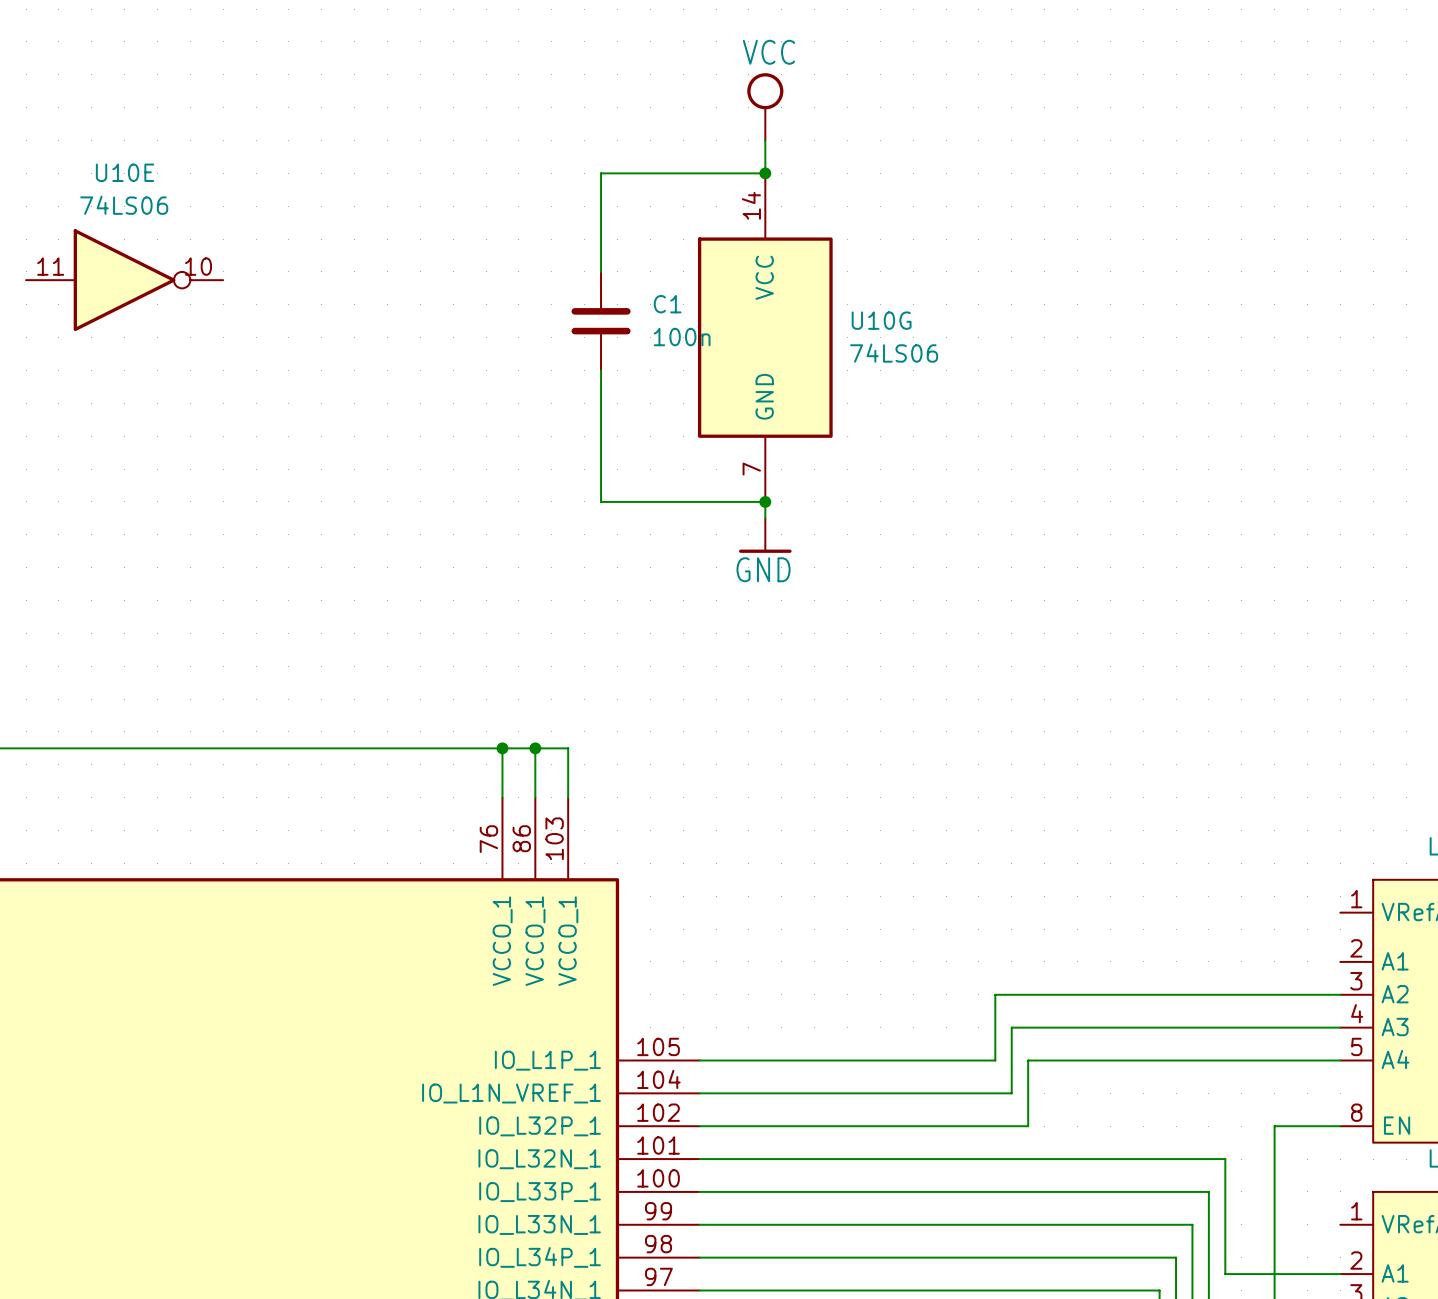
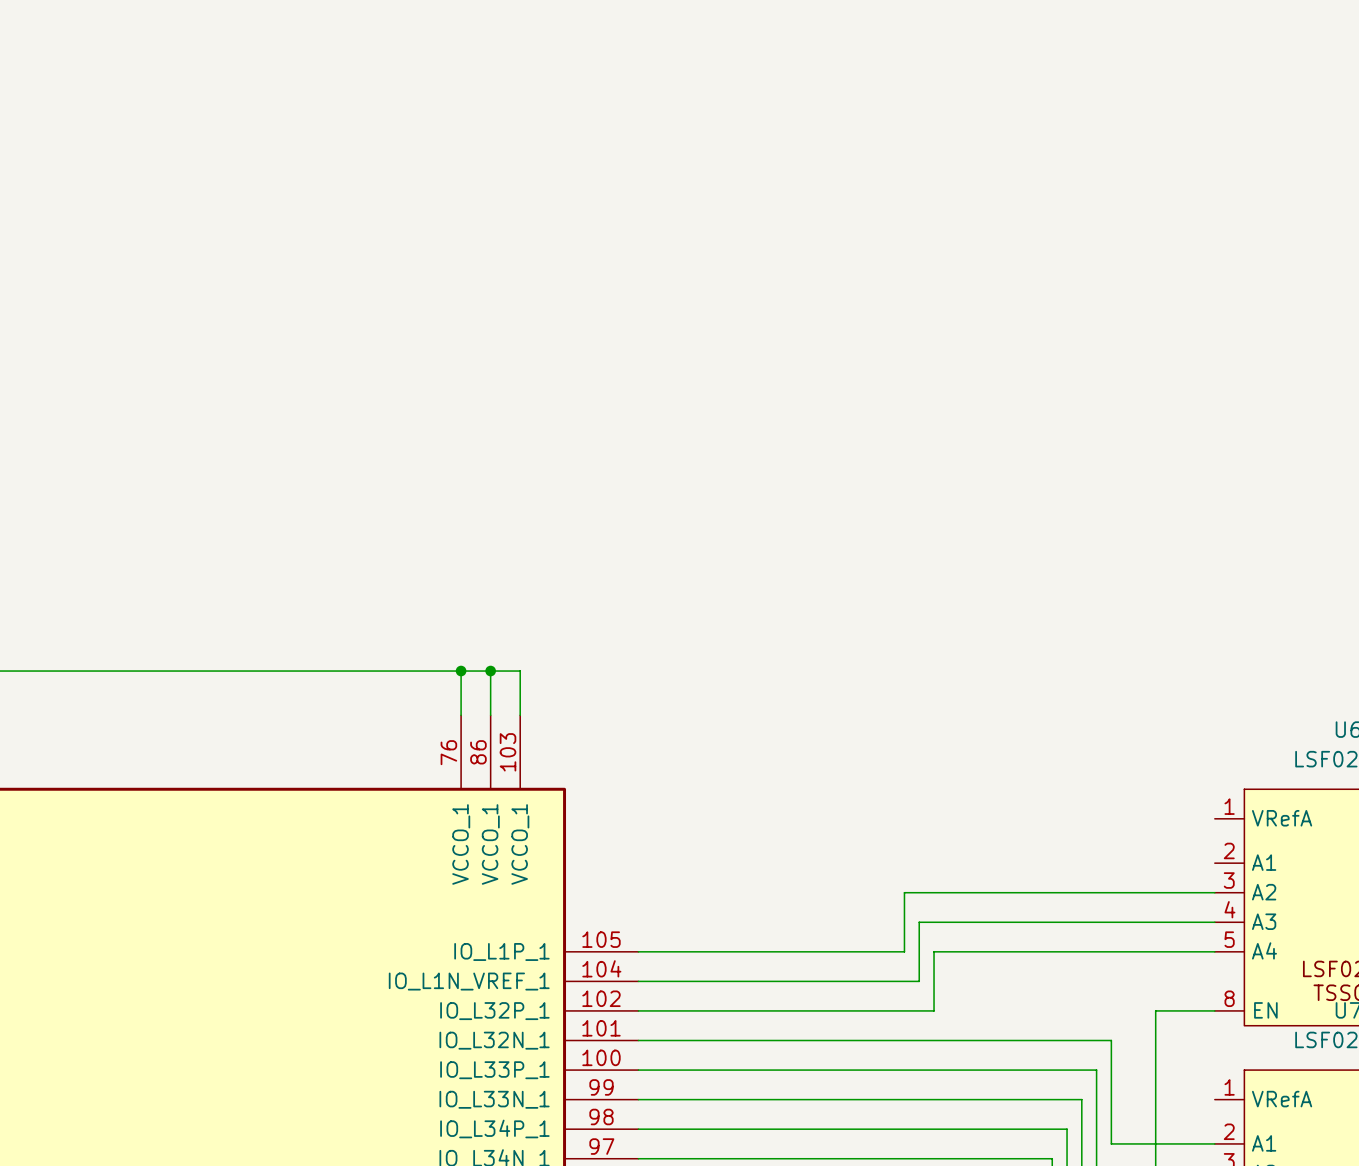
power symbol: VCC (765, 106) -> none
wire: (765, 140) (765, 173) (601, 173) (601, 271) -> none
junction: (765, 173) -> none
U10E: 74LS06 (124, 280) -> none
C1: 100n (601, 321) -> none
U10G: 74LS06 (765, 337) -> none
wire: (601, 370) (601, 501) (765, 501) (765, 518) -> none
junction: (765, 501) -> none
power symbol: GND (765, 535) -> none

